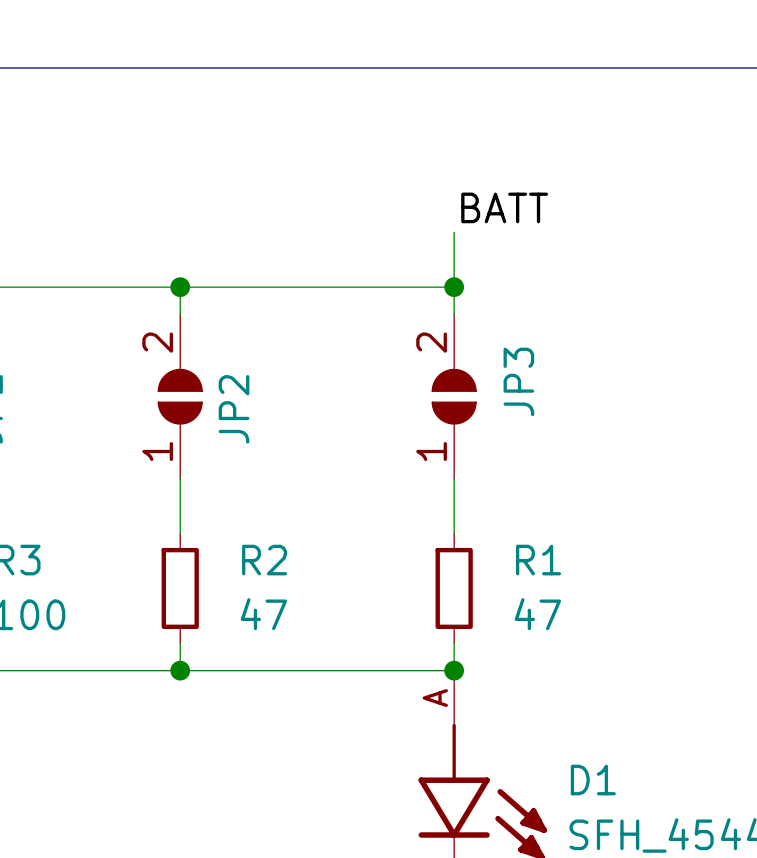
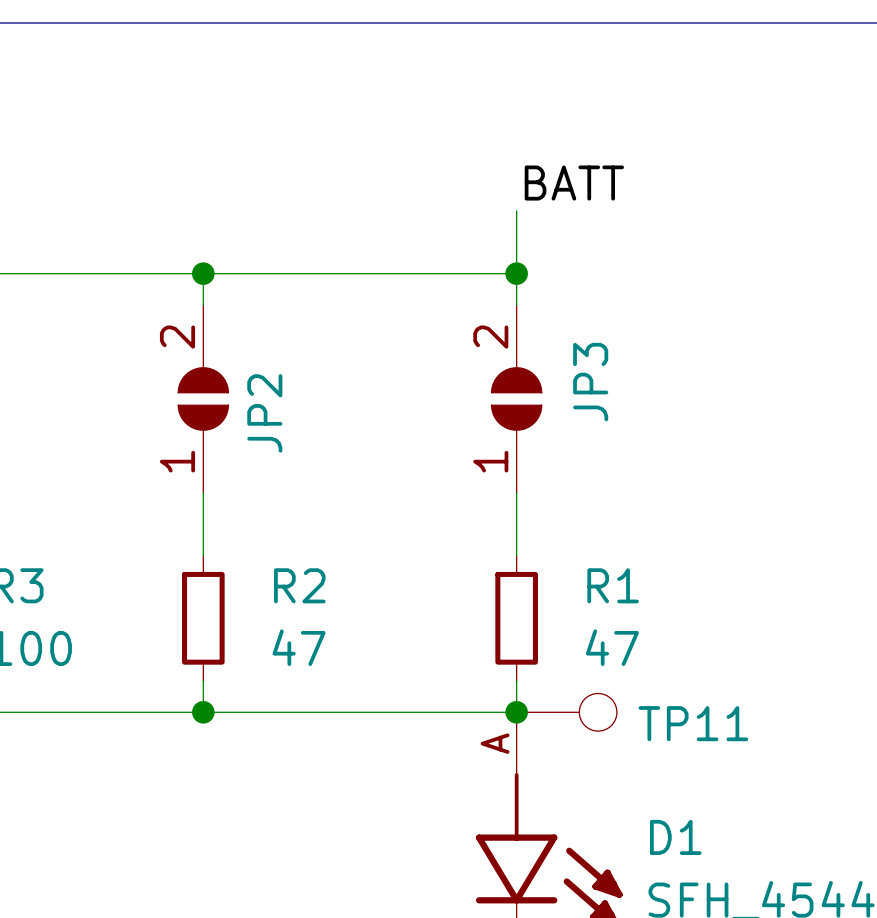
TP11: none -> (566, 712)

